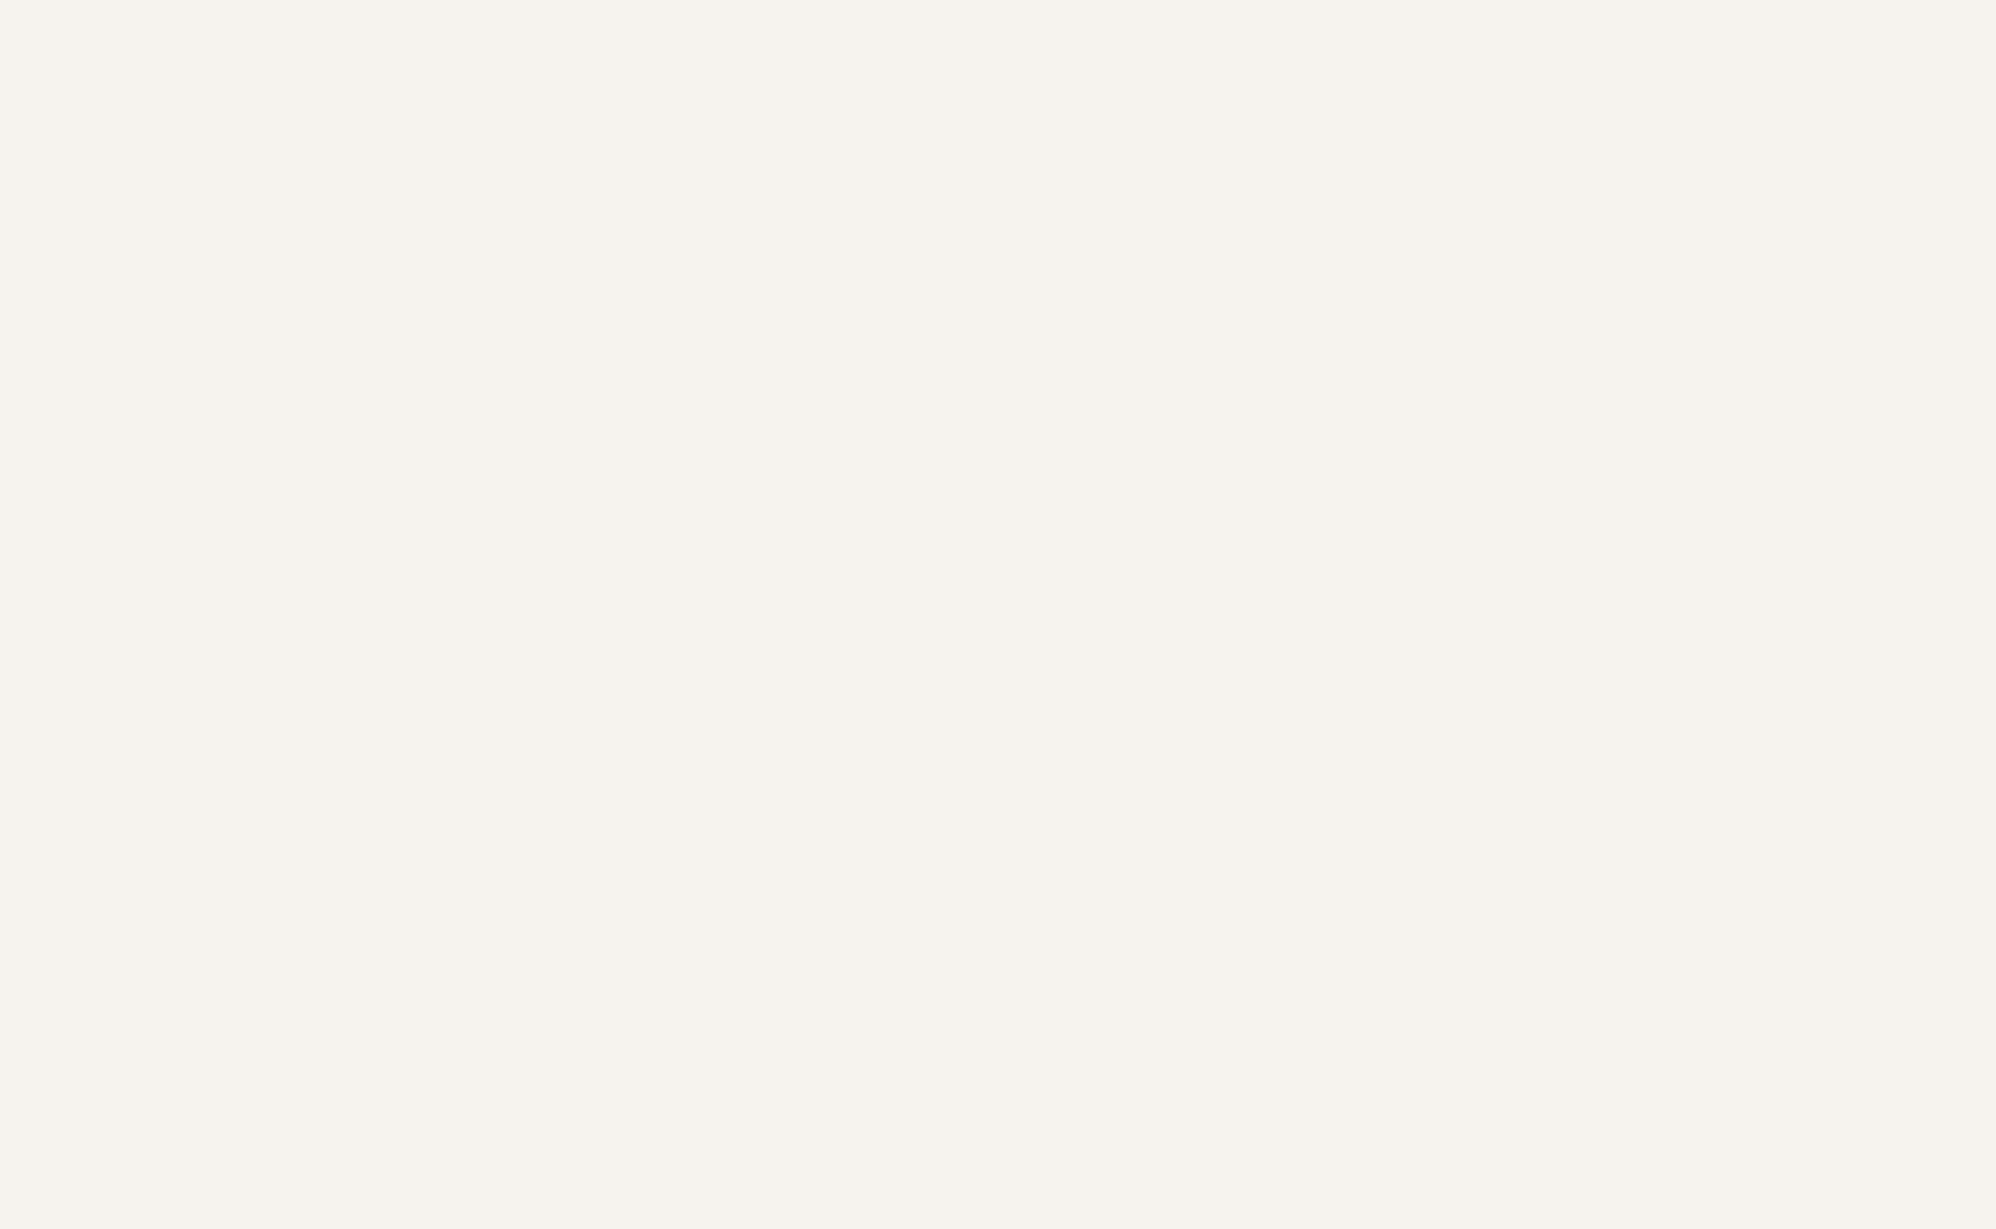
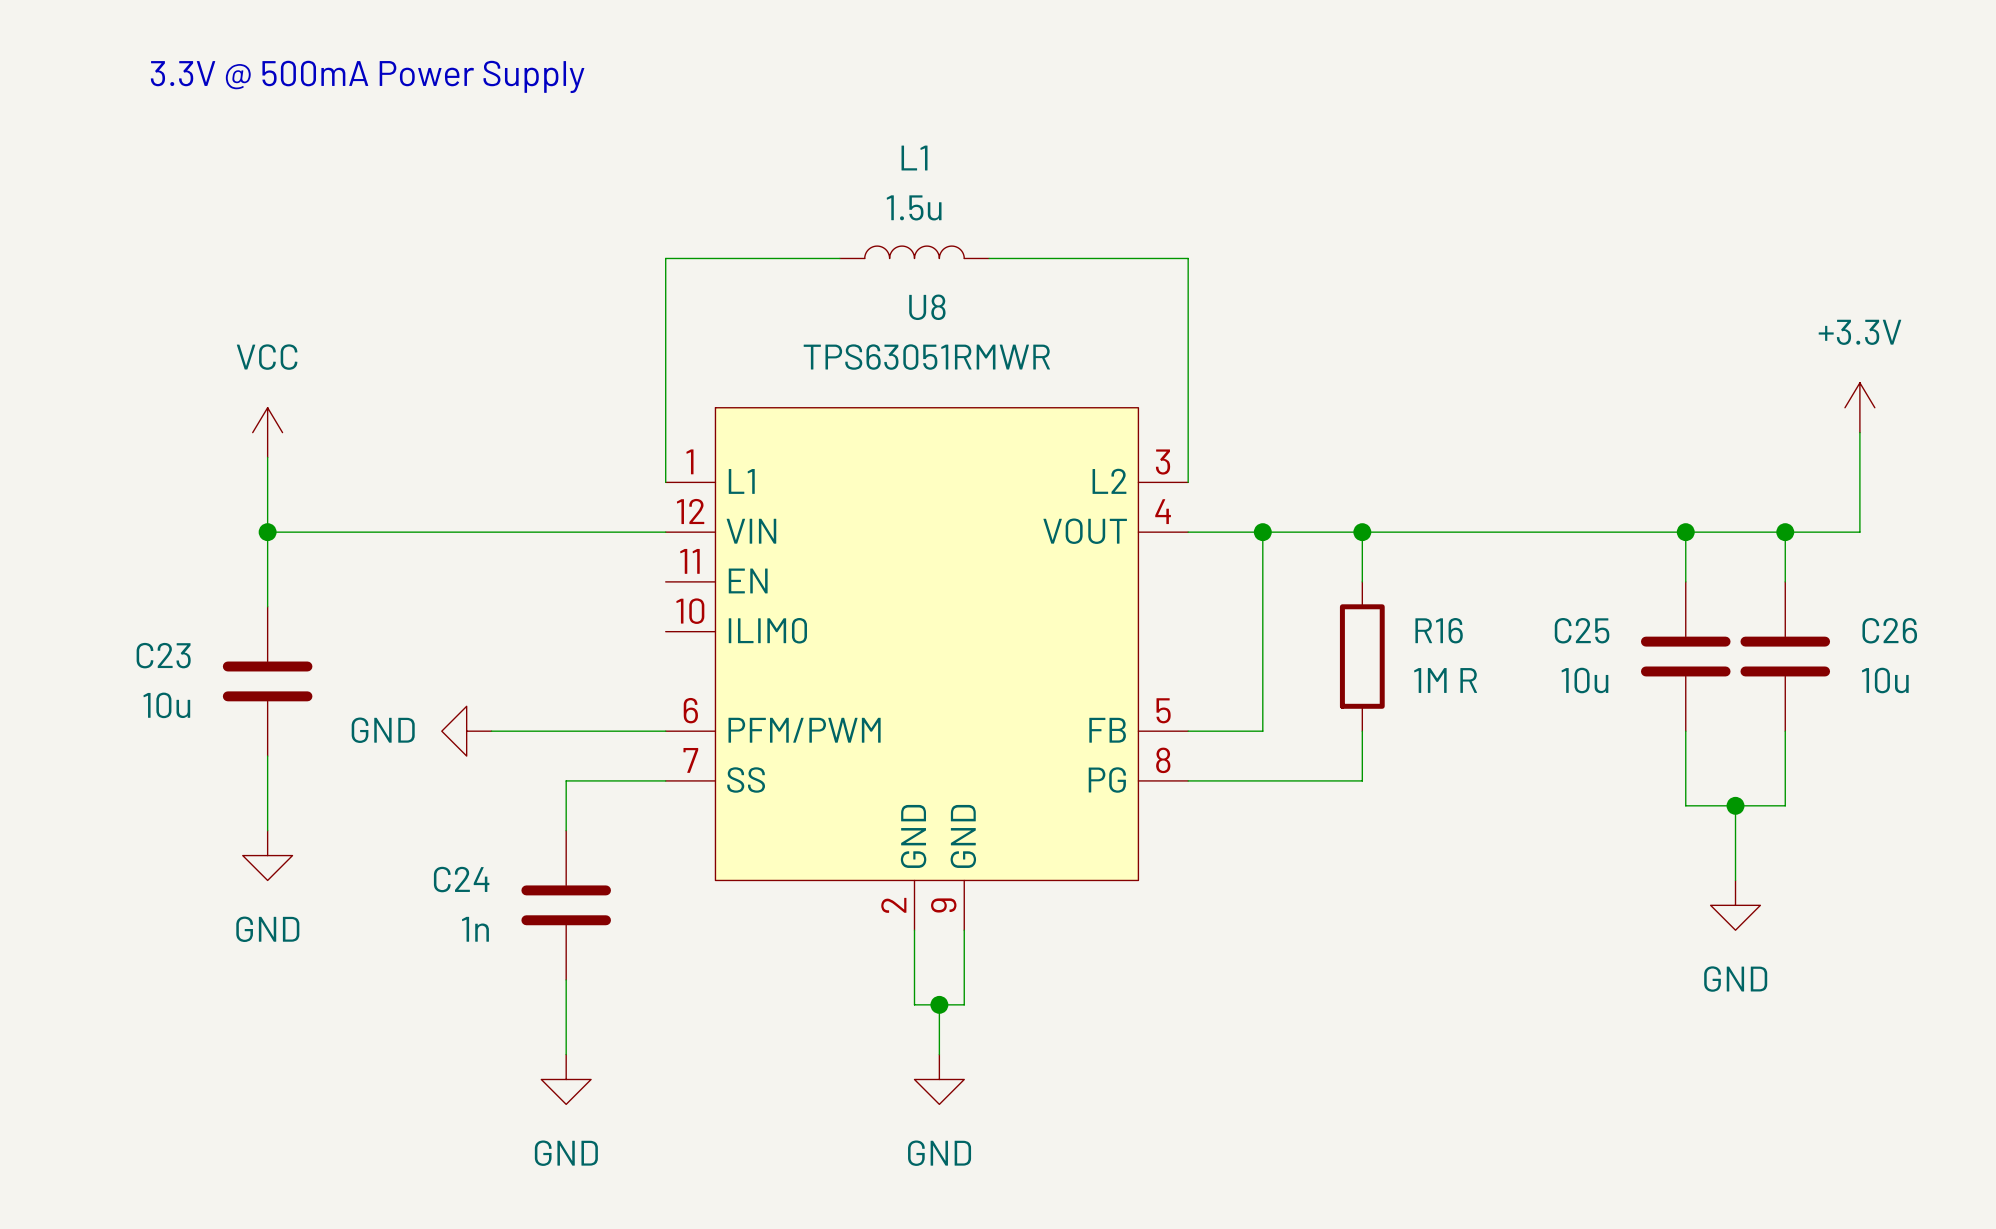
text: none -> 3.3V @ 500mA Power Supply (367, 76)
L1: none -> 1.5u (914, 252)
wire: none -> (839, 258) (665, 258) (665, 482)
wire: none -> (989, 258) (1188, 258) (1188, 482)
power symbol: none -> +3.3V (1859, 407)
power symbol: none -> VCC (267, 432)
wire: none -> (1859, 432) (1859, 532) (1188, 532)
wire: none -> (267, 457) (267, 606)
wire: none -> (267, 532) (665, 532)
junction: none -> (267, 532)
wire: none -> (1262, 532) (1262, 731) (1188, 731)
junction: none -> (1262, 532)
wire: none -> (1362, 532) (1362, 581)
junction: none -> (1362, 532)
wire: none -> (1685, 532) (1685, 581)
junction: none -> (1685, 532)
wire: none -> (1785, 532) (1785, 581)
junction: none -> (1785, 532)
R16: none -> 1M R (1362, 656)
C25: none -> 10u (1685, 656)
C26: none -> 10u (1785, 656)
U8: none -> TPS63051RMWR (926, 668)
C23: none -> 10u (267, 681)
power symbol: none -> GND (466, 731)
wire: none -> (491, 731) (665, 731)
wire: none -> (1362, 731) (1362, 780) (1188, 780)
wire: none -> (1685, 731) (1685, 805) (1785, 805) (1785, 731)
wire: none -> (267, 756) (267, 830)
wire: none -> (665, 780) (566, 780) (566, 830)
wire: none -> (1735, 805) (1735, 880)
junction: none -> (1735, 805)
power symbol: none -> GND (267, 855)
C24: none -> 1n (566, 905)
power symbol: none -> GND (1735, 905)
wire: none -> (914, 930) (914, 1004) (964, 1004) (964, 930)
wire: none -> (566, 979) (566, 1054)
wire: none -> (939, 1004) (939, 1054)
junction: none -> (939, 1004)
power symbol: none -> GND (566, 1079)
power symbol: none -> GND (939, 1079)

